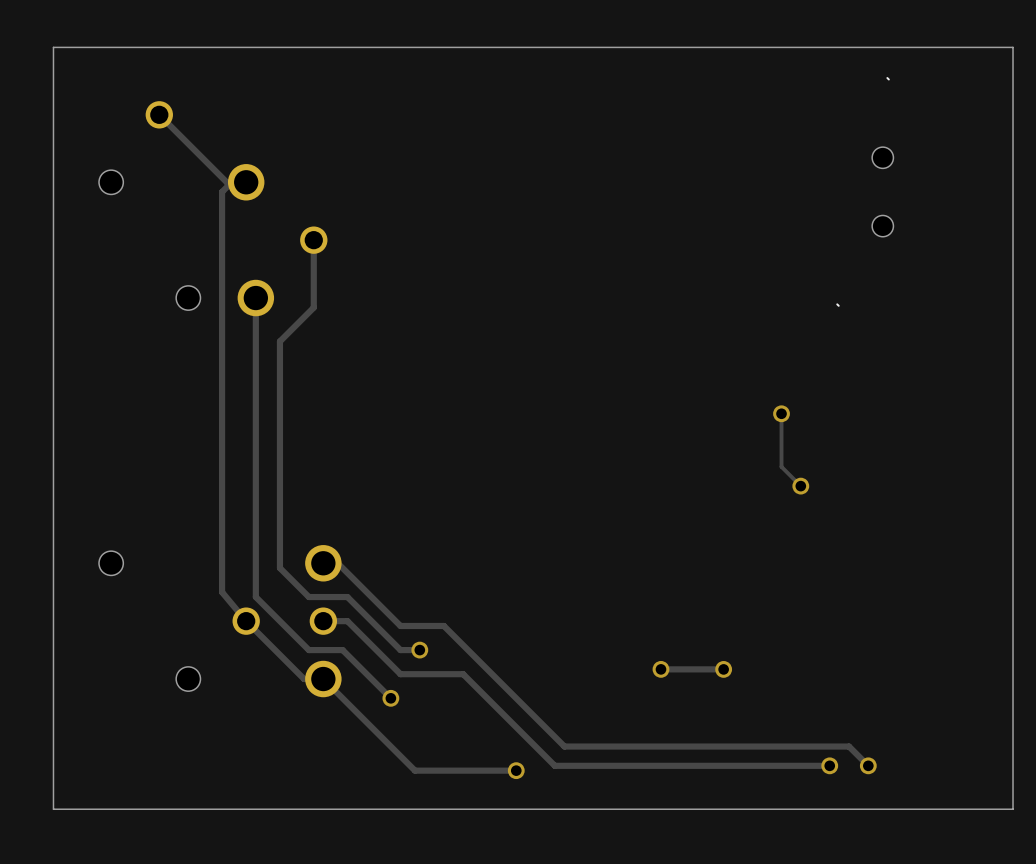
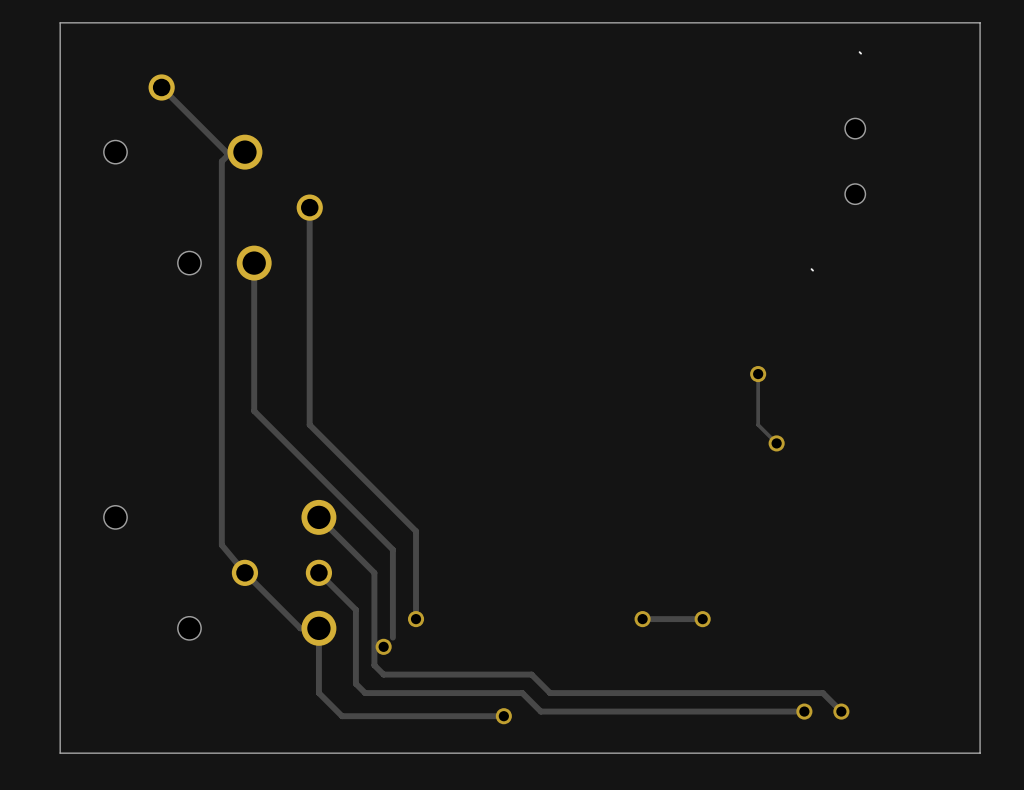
track: (313, 240) (313, 307) (279, 341) (279, 568) (308, 597) (347, 597) (400, 650) (419, 650) -> (309, 207) (309, 424) (416, 531) (416, 619)
track: (255, 452) (255, 597) (308, 650) (342, 650) (390, 698) -> (254, 411) (392, 549) (392, 637)
track: (323, 563) (337, 563) (400, 625) (443, 625) (545, 727) -> (318, 517) (374, 572) (374, 665) (383, 674) (531, 674)
track: (323, 621) (347, 621) (400, 674) (463, 674) (535, 746) -> (318, 572) (355, 609) (355, 683) (365, 693) (522, 693)
via position: (419, 650) -> (416, 619)
track: (323, 679) (414, 770) -> (318, 628) (318, 693) (342, 716) (406, 716)

